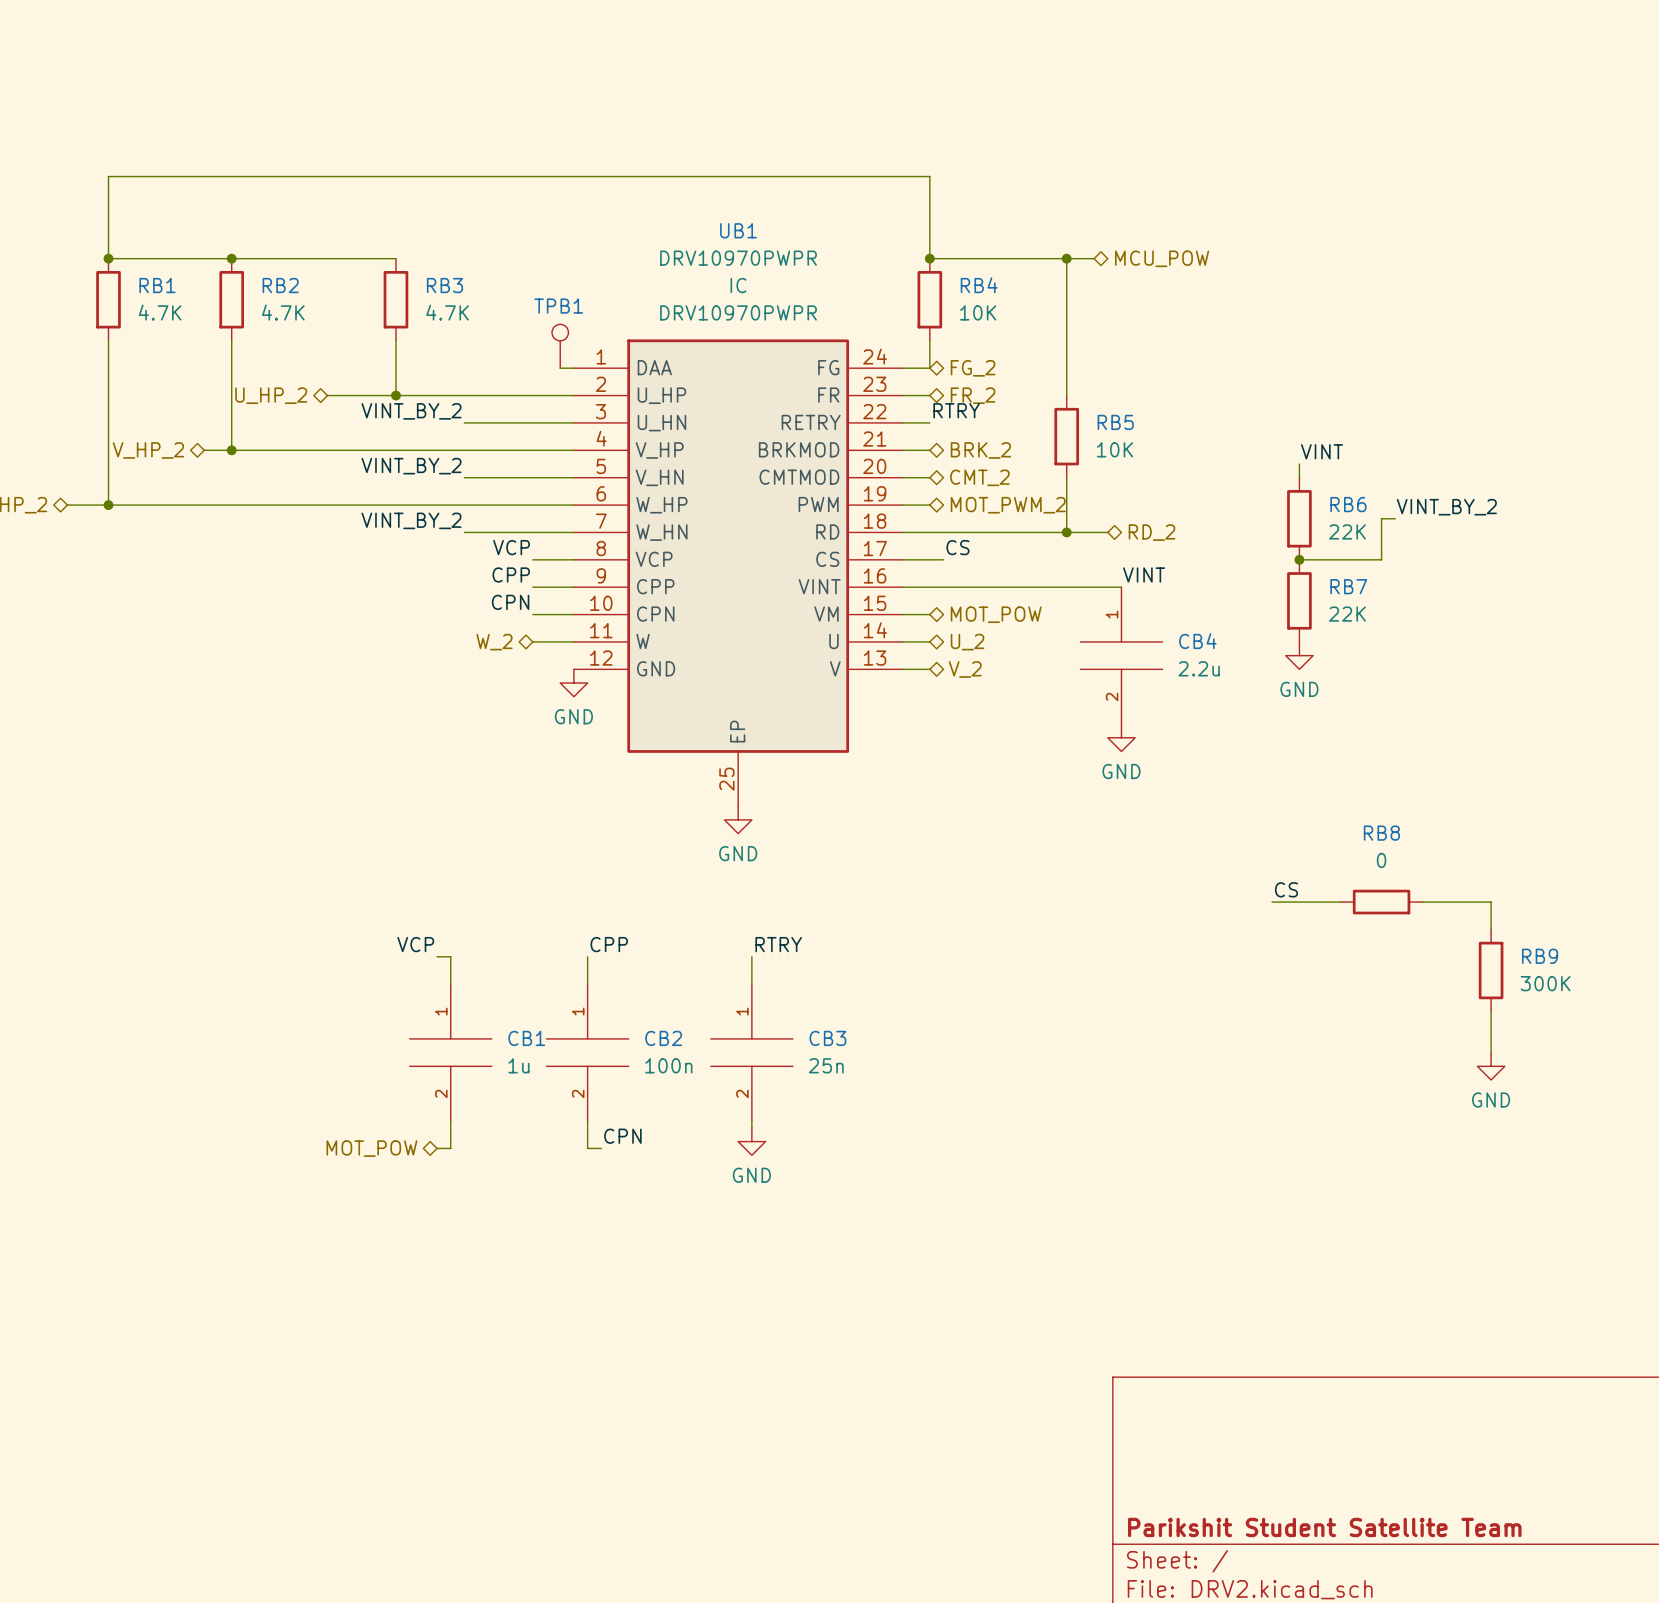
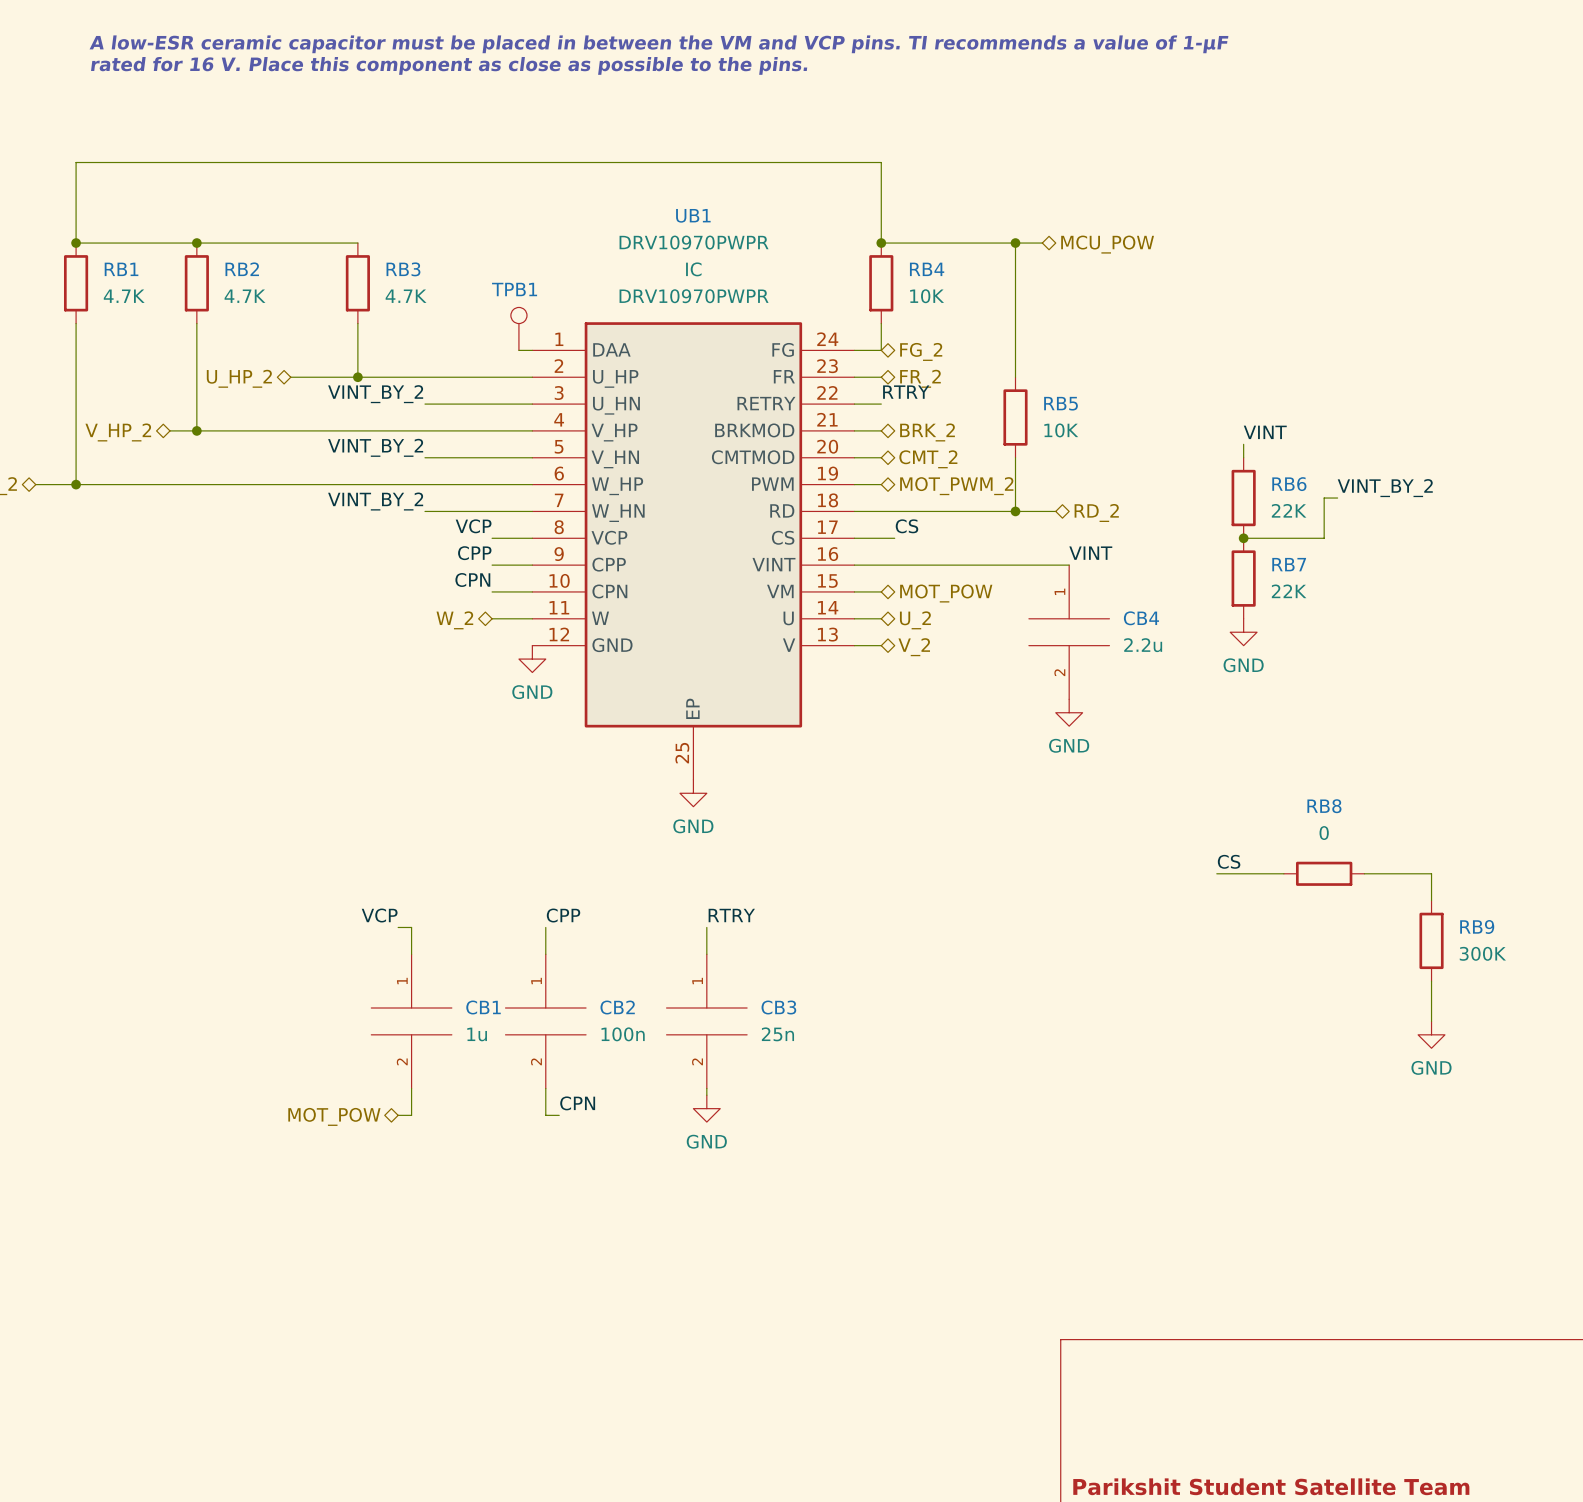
text: none -> A low-ESR ceramic capacitor must be placed in between the VM and VCP pins. TI recommends a value of 1-µF (658, 44)
text: none -> rated for 16 V. Place this component as close as possible to the pins. (449, 65)

